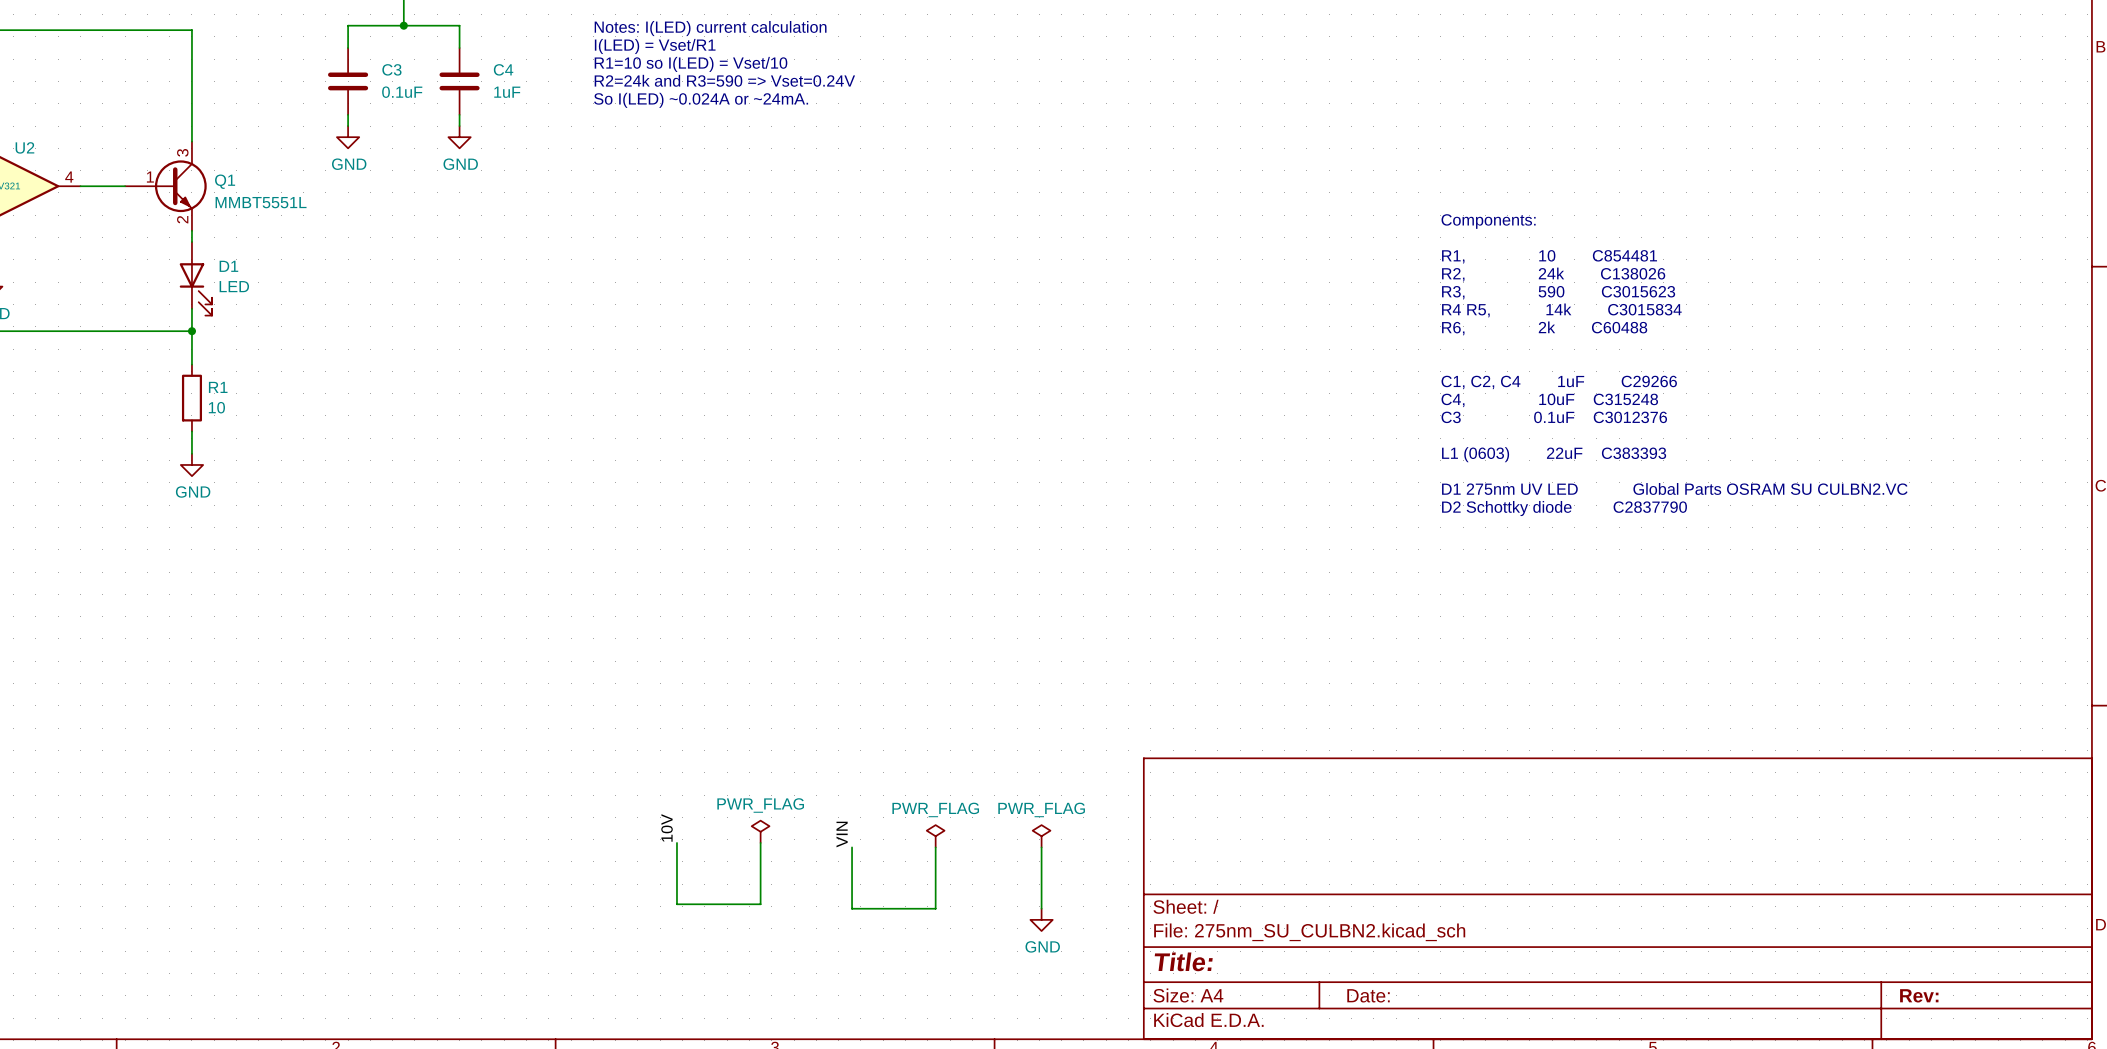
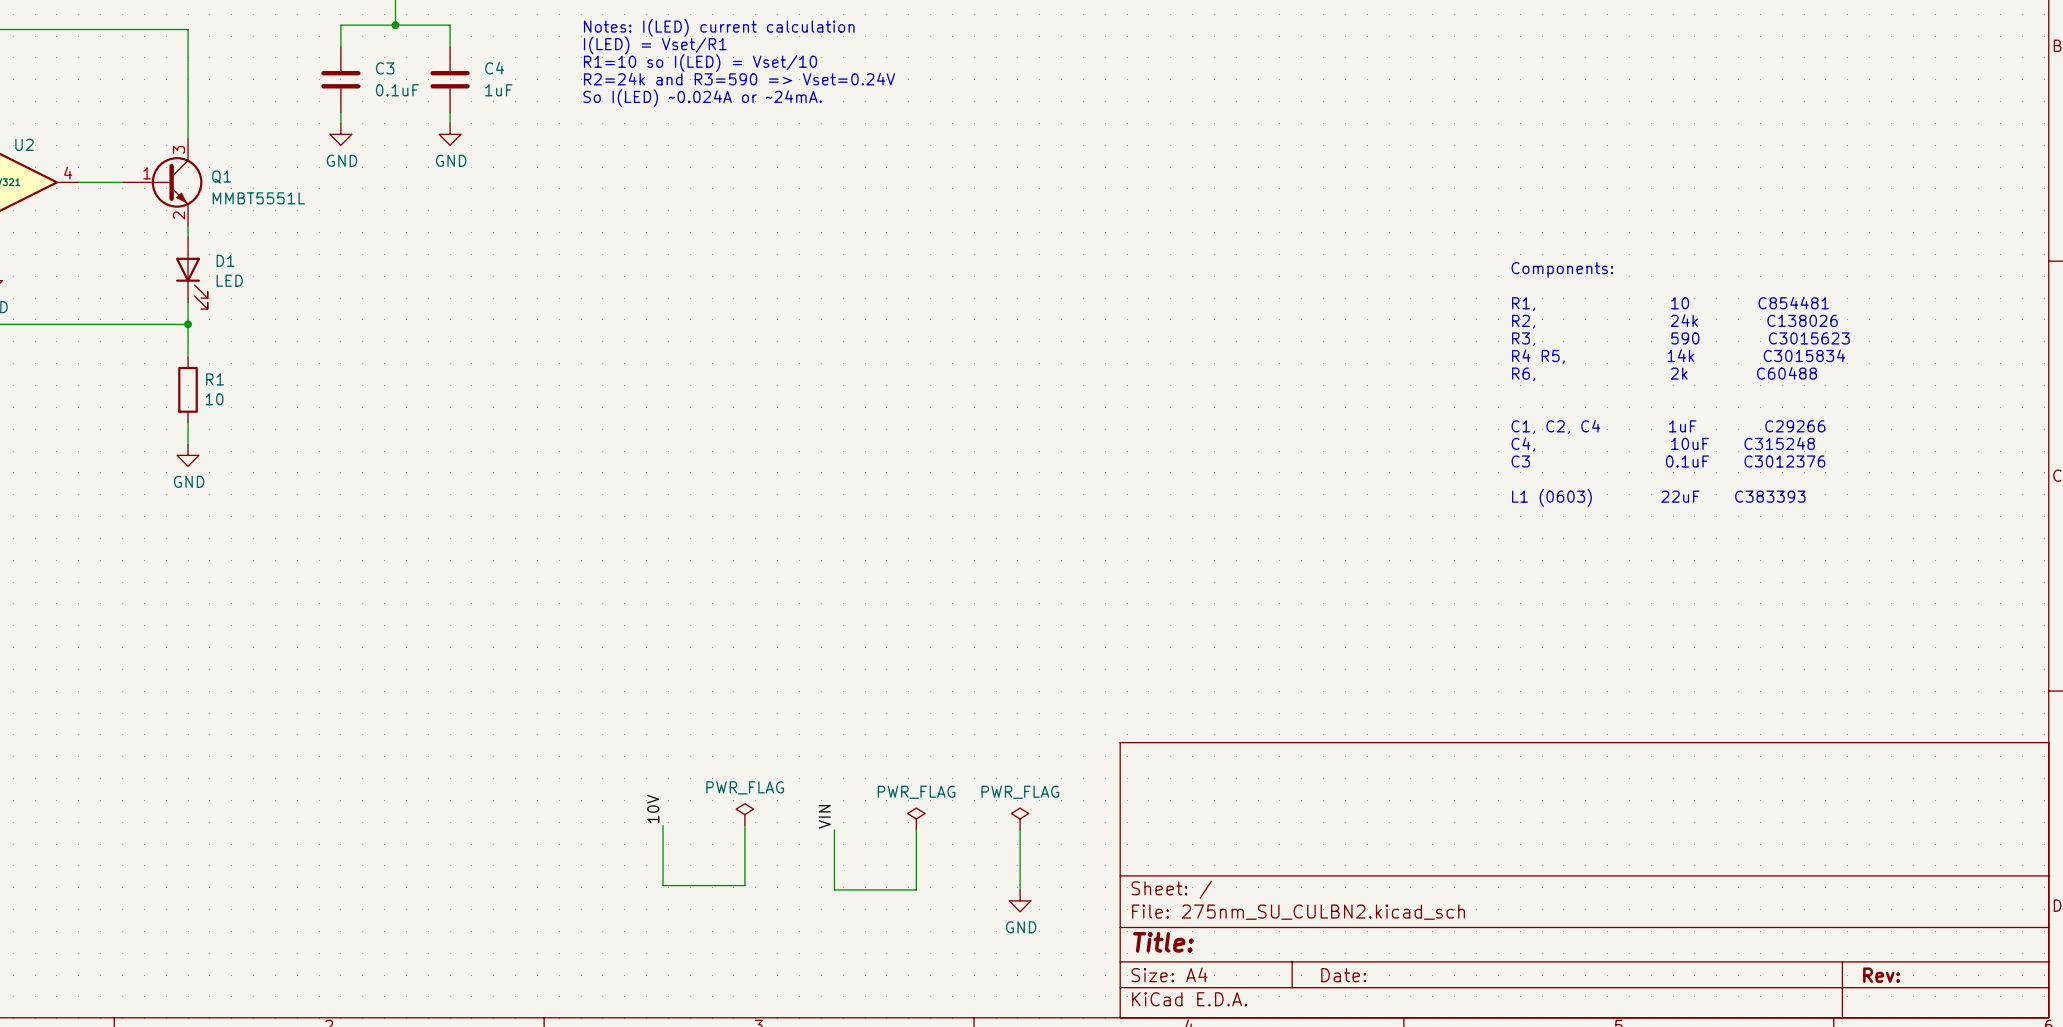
text position: Components: (1488, 221) -> Components: (1562, 269)
text position: R1, 10 C854481 (1549, 256) -> R1, 10 C854481 (1670, 303)
text position: R2, 24k C138026 (1553, 274) -> R2, 24k C138026 (1674, 321)
text position: R3, 590 C3015623 (1558, 292) -> R3, 590 C3015623 (1680, 339)
text position: R4 R5, 14k C3015834 (1561, 310) -> R4 R5, 14k C3015834 (1678, 356)
text position: R6, 2k C60488 (1544, 328) -> R6, 2k C60488 (1664, 374)
text position: C1, C2, C4 1uF C29266 (1559, 382) -> C1, C2, C4 1uF C29266 (1668, 426)
text position: C4, 10uF C315248 (1549, 400) -> C4, 10uF C315248 (1663, 444)
text position: C3 0.1uF C3012376 (1554, 417) -> C3 0.1uF C3012376 (1668, 461)
text position: L1 (0603) 22uF C383393 (1554, 454) -> L1 (0603) 22uF C383393 (1658, 497)
text: D1 275nm UV LED Global Parts OSRAM SU CULBN2.VC (1674, 488) -> none
text: D2 Schottky diode C2837790 (1564, 508) -> none

